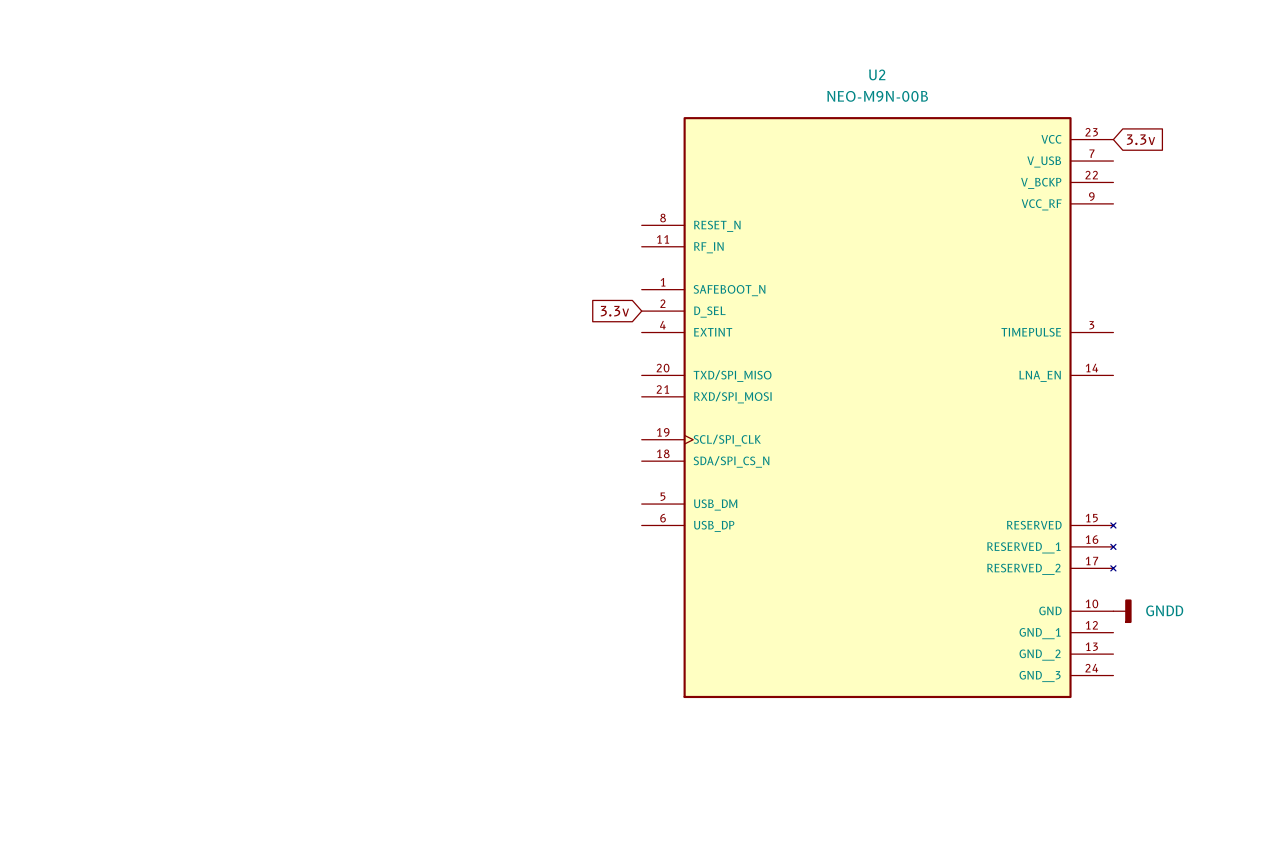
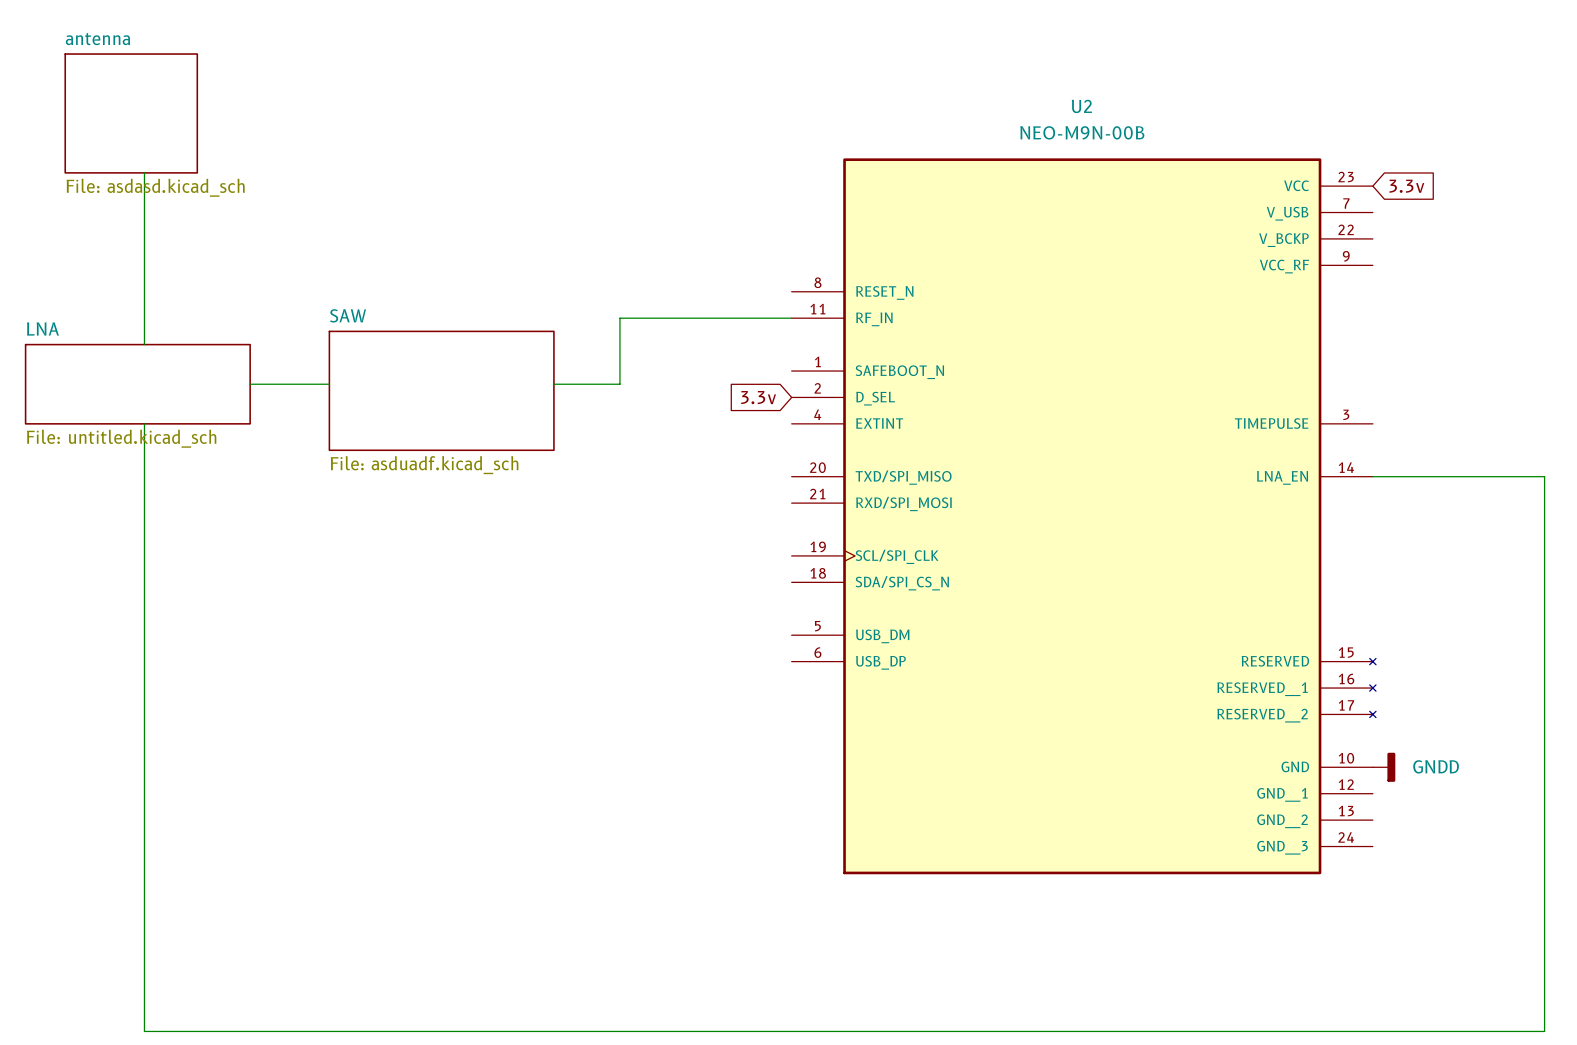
sheet antenna: none -> File: asdasd.kicad_sch (131, 113)
wire: none -> (144, 172) (144, 344)
wire: none -> (791, 318) (619, 318) (619, 384) (553, 384)
sheet LNA: none -> File: untitled.kicad_sch (137, 384)
wire: none -> (250, 384) (329, 384)
sheet SAW: none -> File: asduadf.kicad_sch (441, 390)
wire: none -> (144, 423) (144, 1031) (1544, 1031) (1544, 476) (1372, 476)

